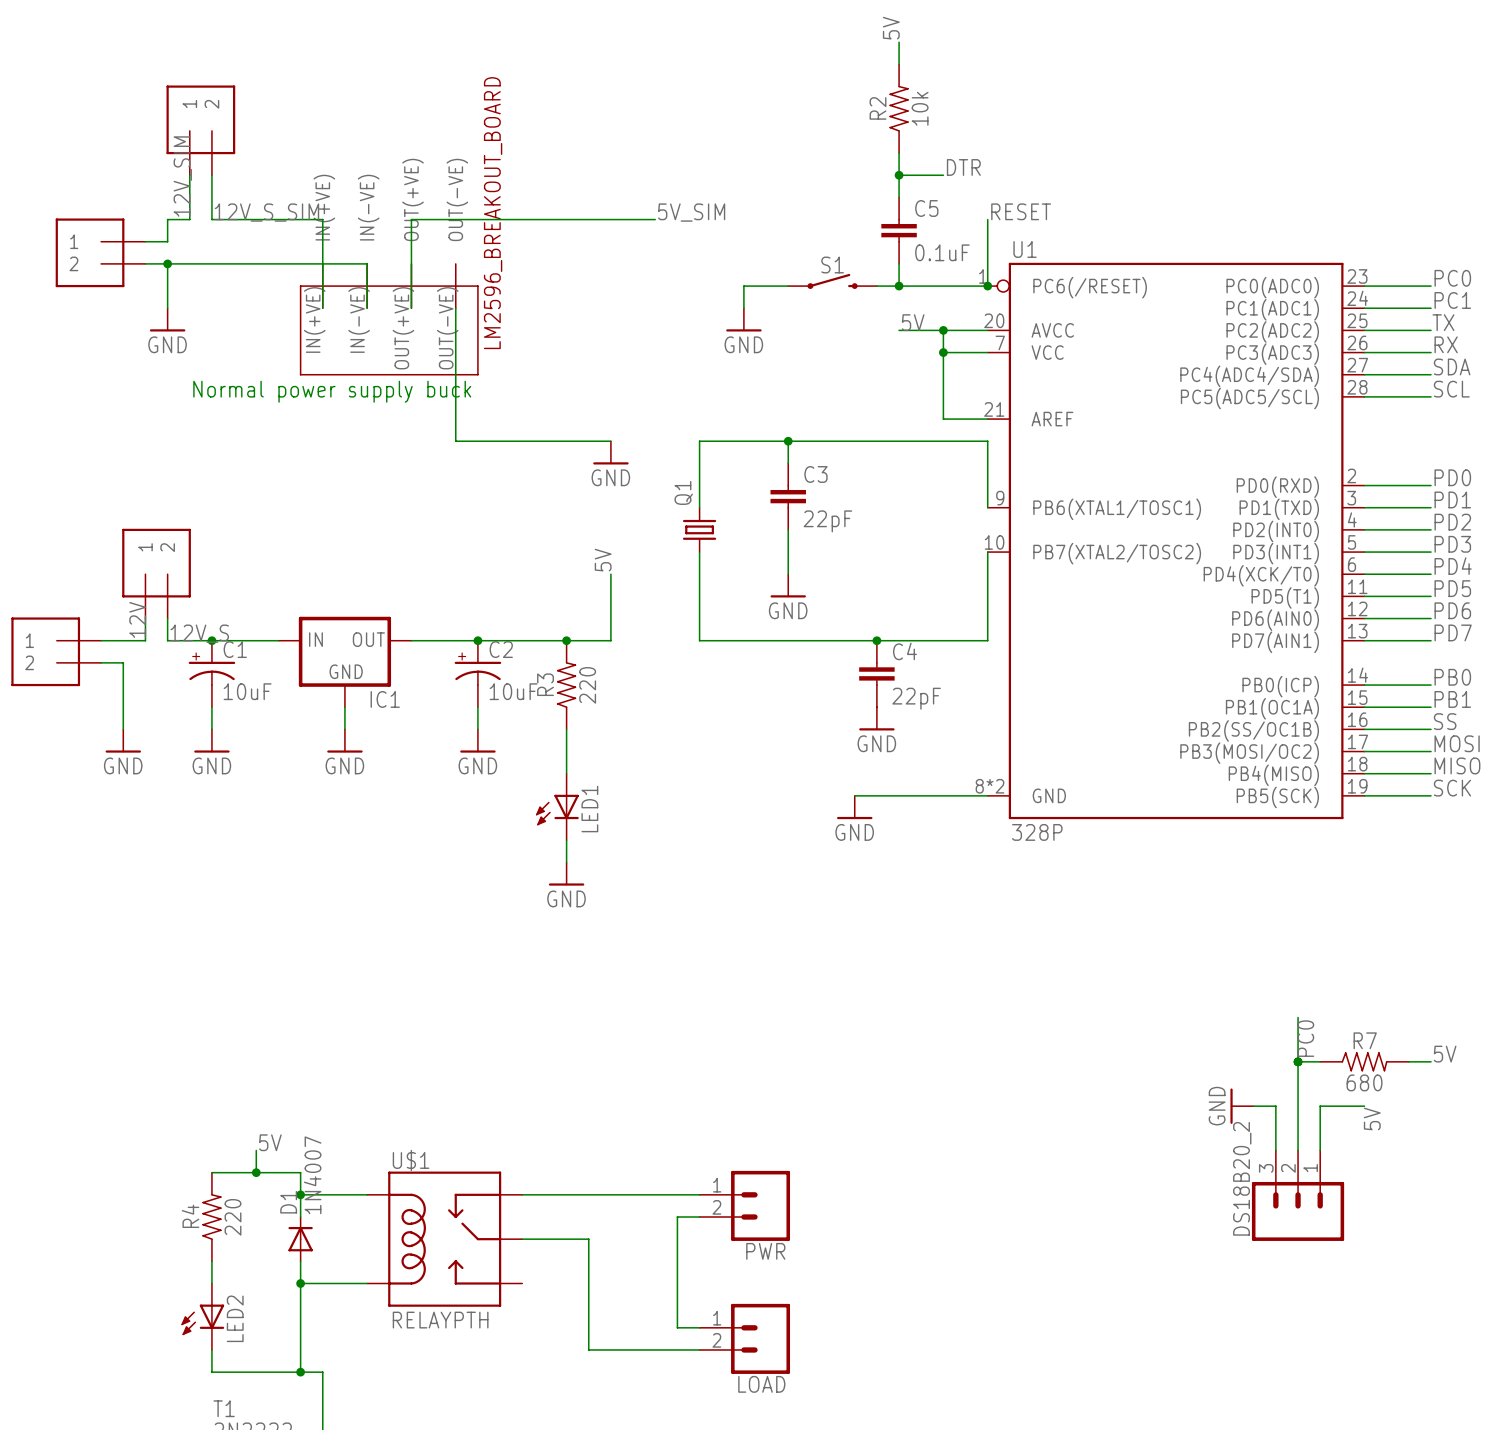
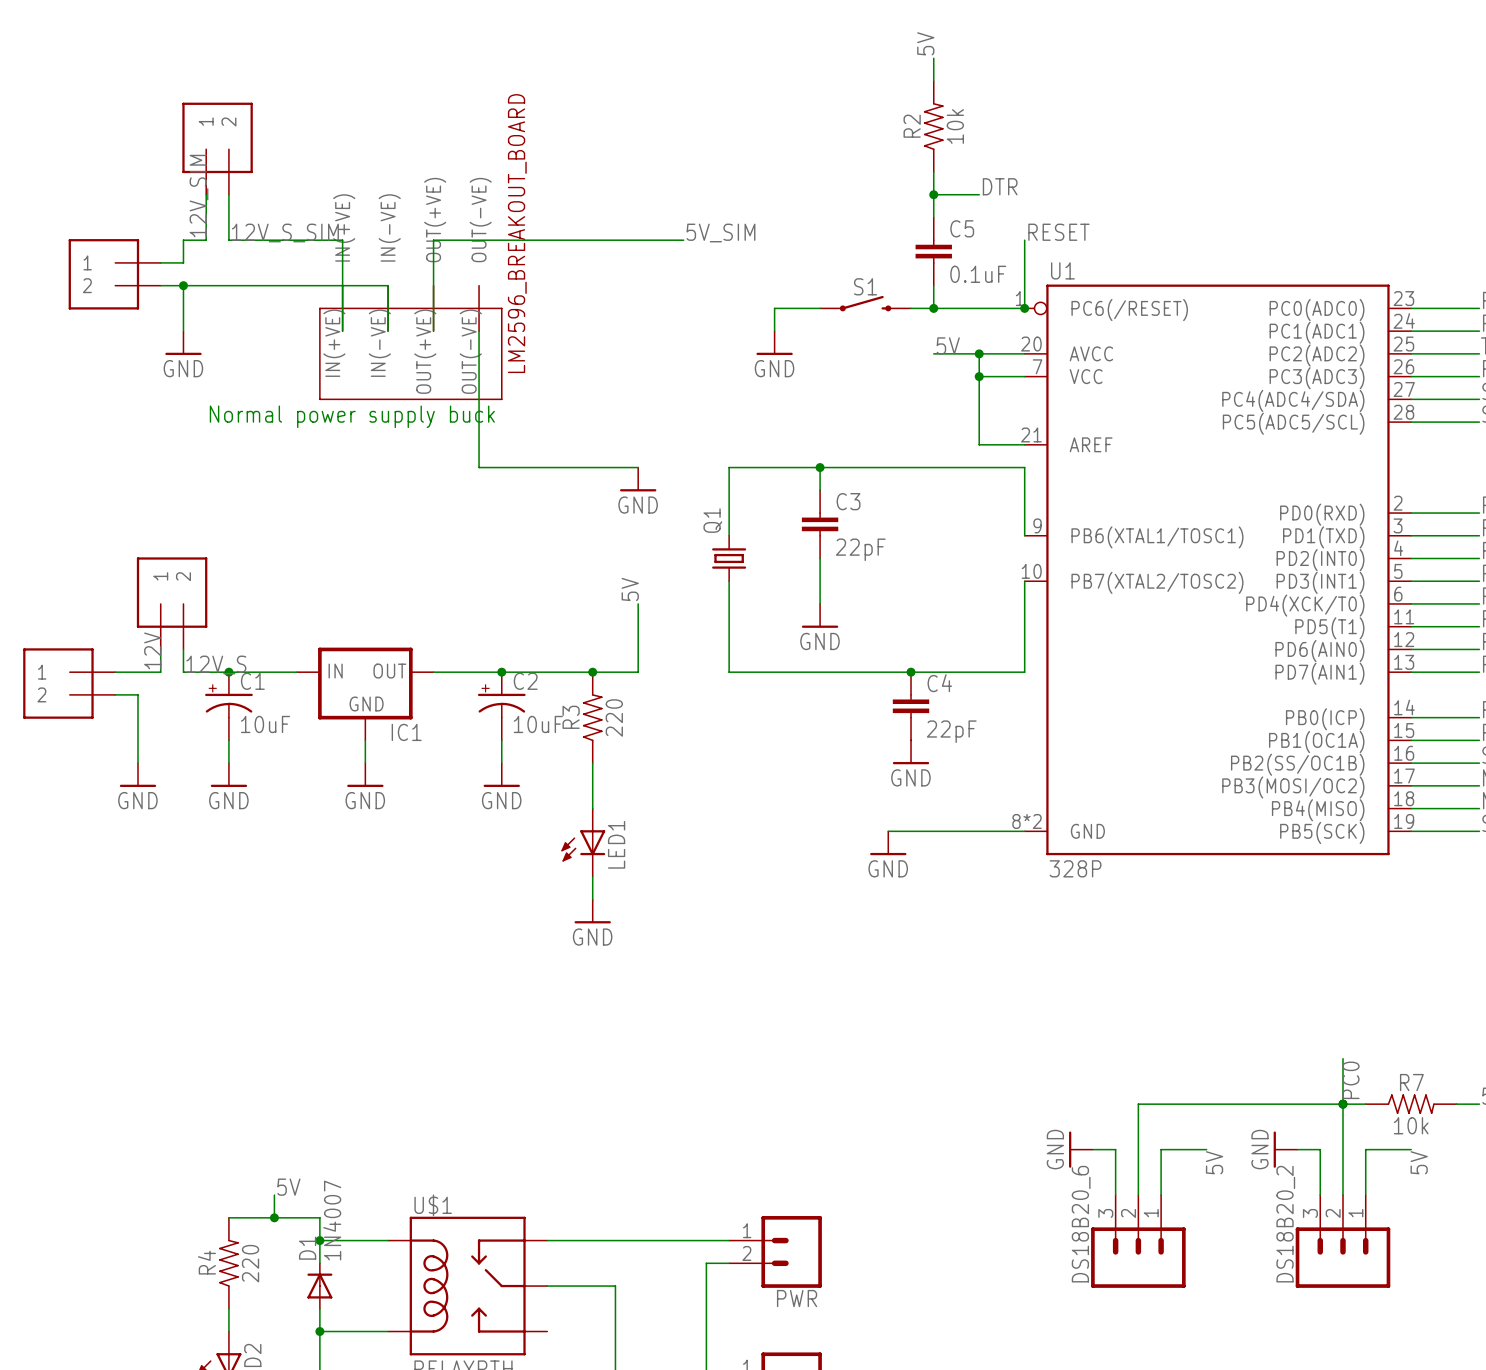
wire: none -> (1342, 1104) (1138, 1104) (1138, 1195)
R7 value: 680 (1364, 1082) -> 10k (1411, 1125)
power symbol: none -> GND (1080, 1149)
wire: none -> (1092, 1149) (1115, 1149) (1115, 1195)
wire: none -> (1206, 1149) (1161, 1149) (1161, 1195)
label: none -> 5V (1214, 1162)
DS18B20_6: none -> (1138, 1241)

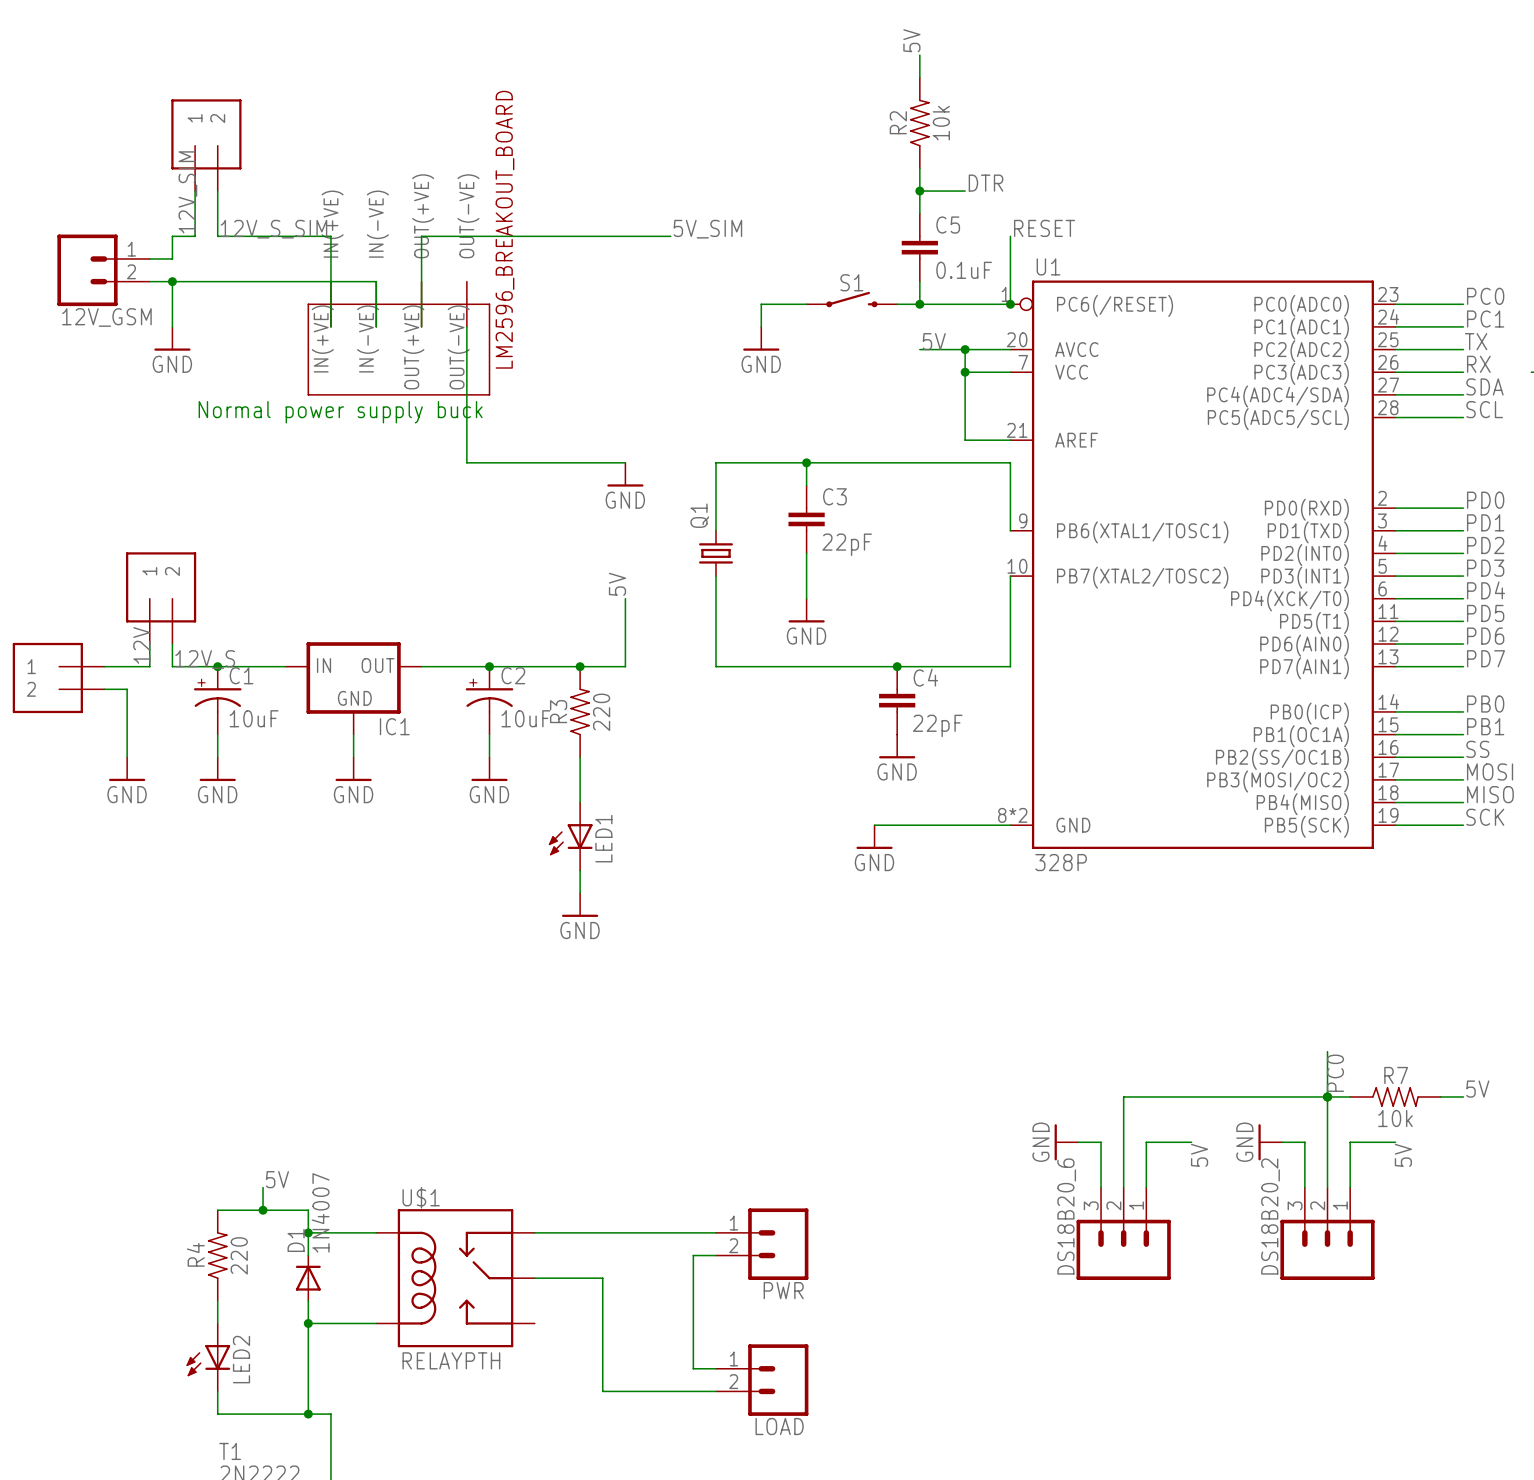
part: (114, 274) -> none
12V_GSM: none -> (103, 270)

